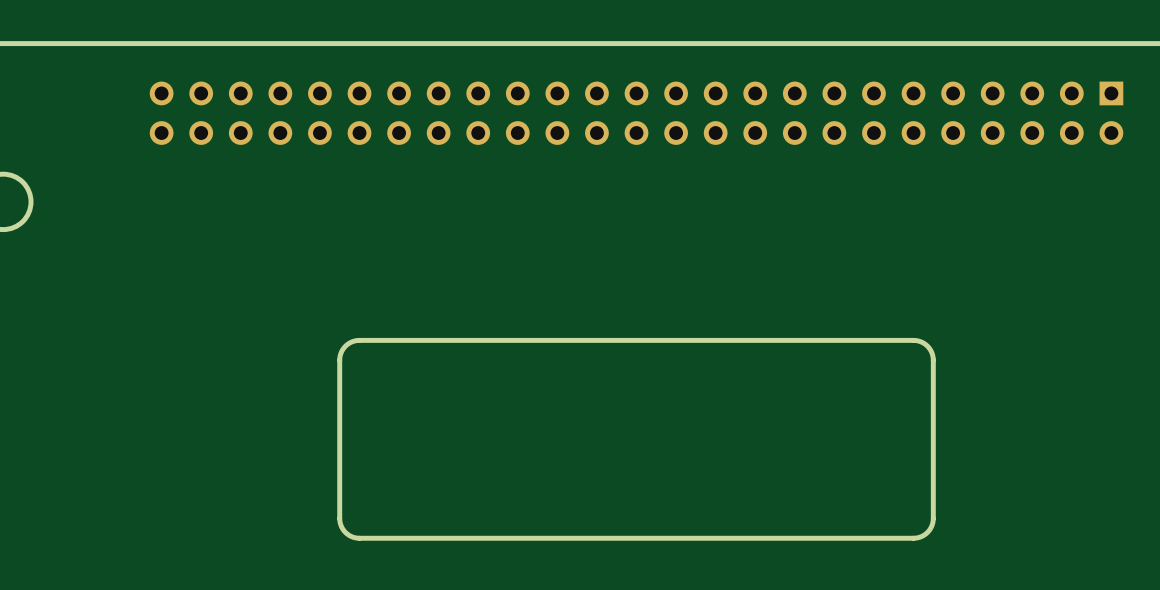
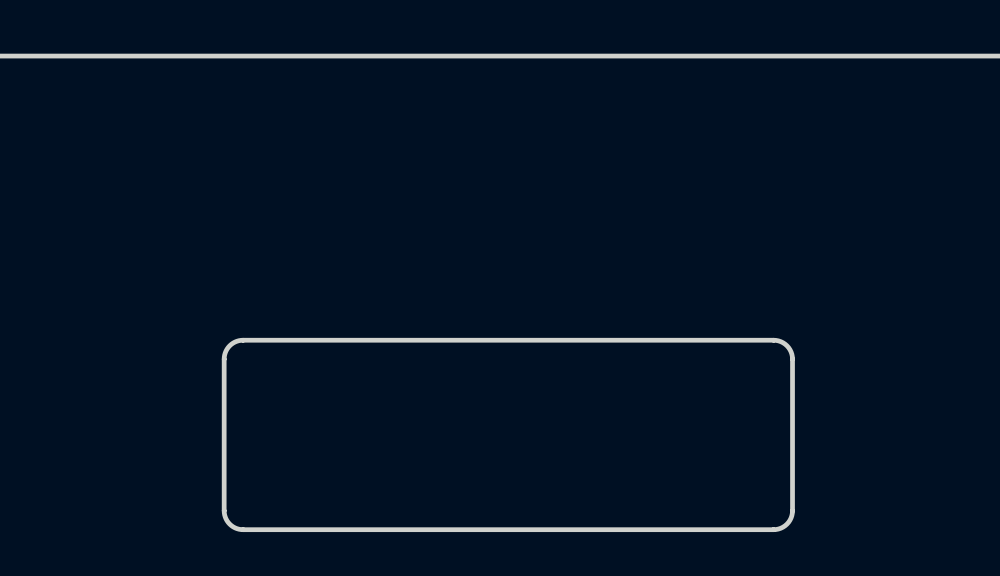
part: (636, 113) -> none

